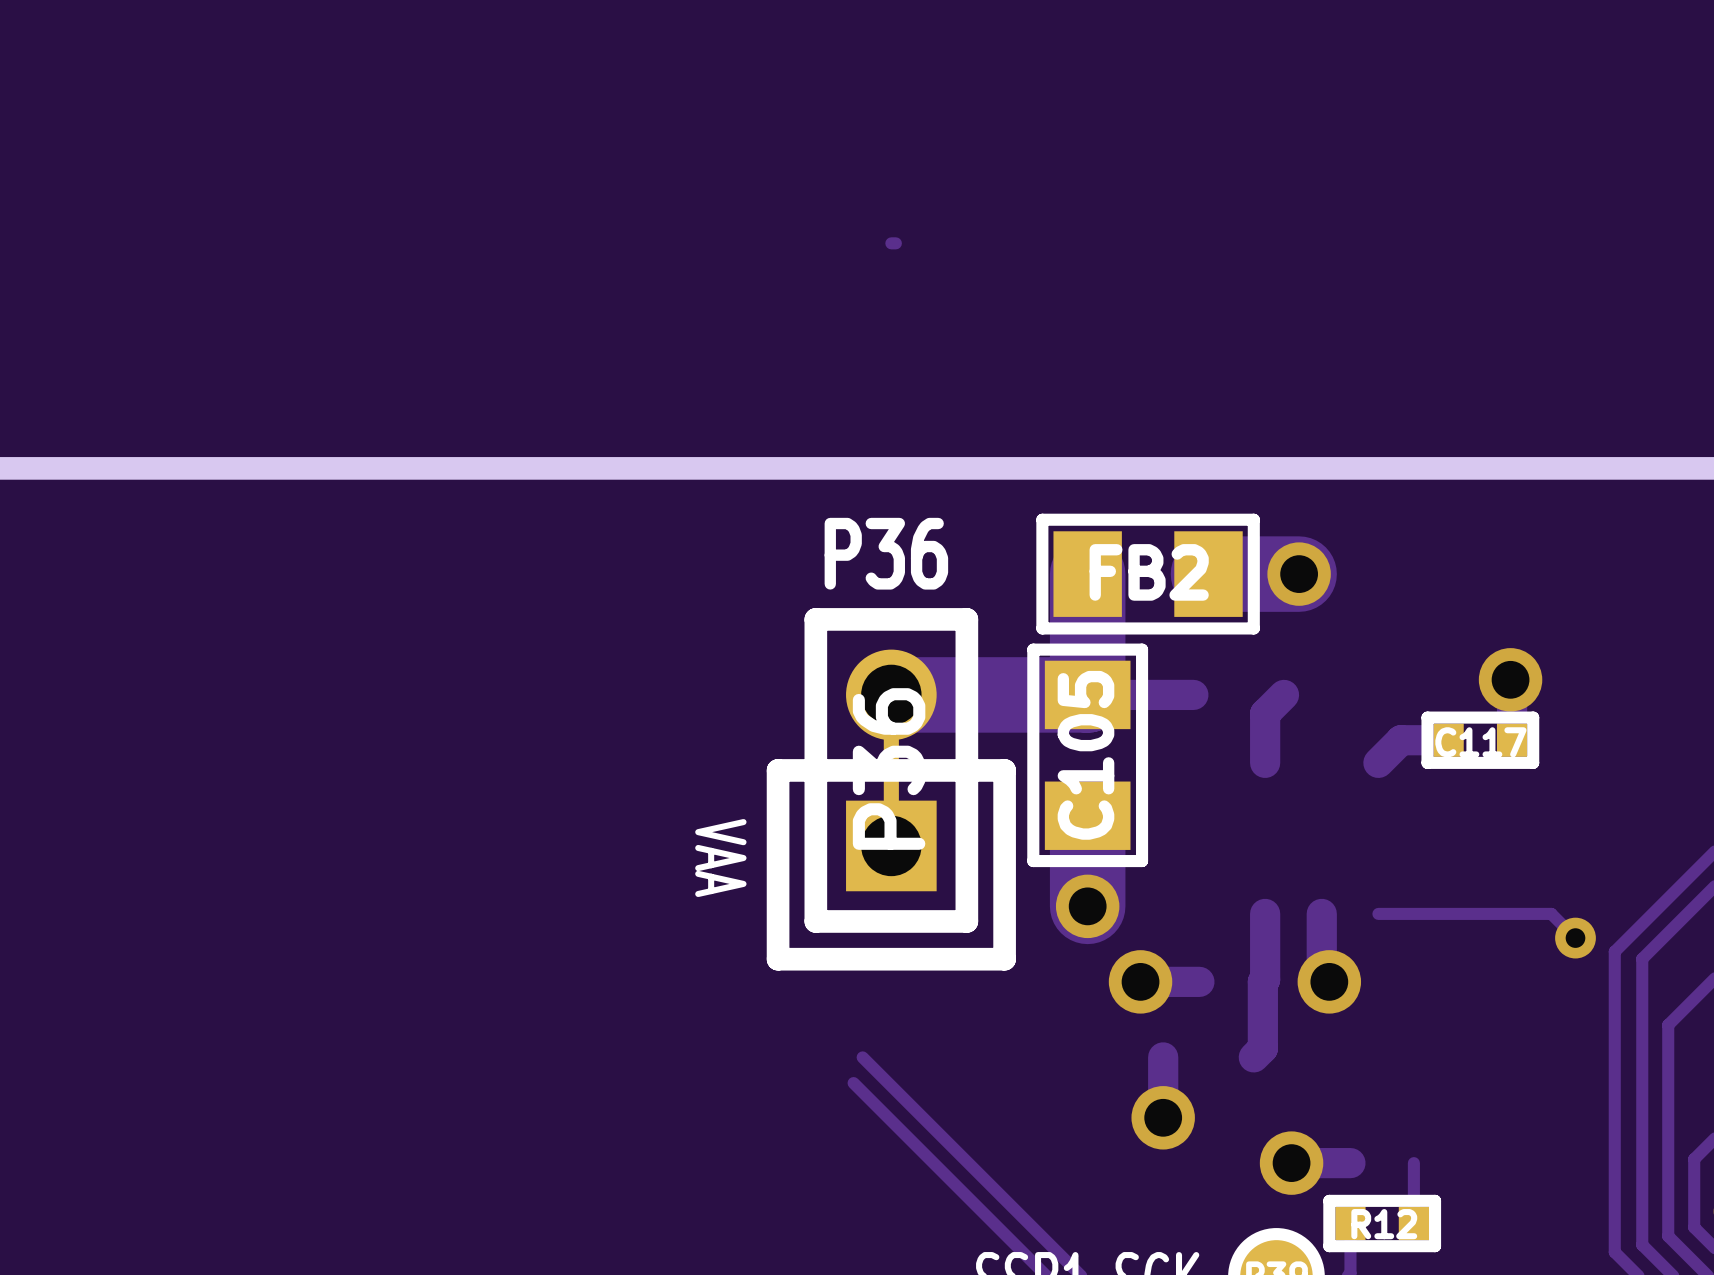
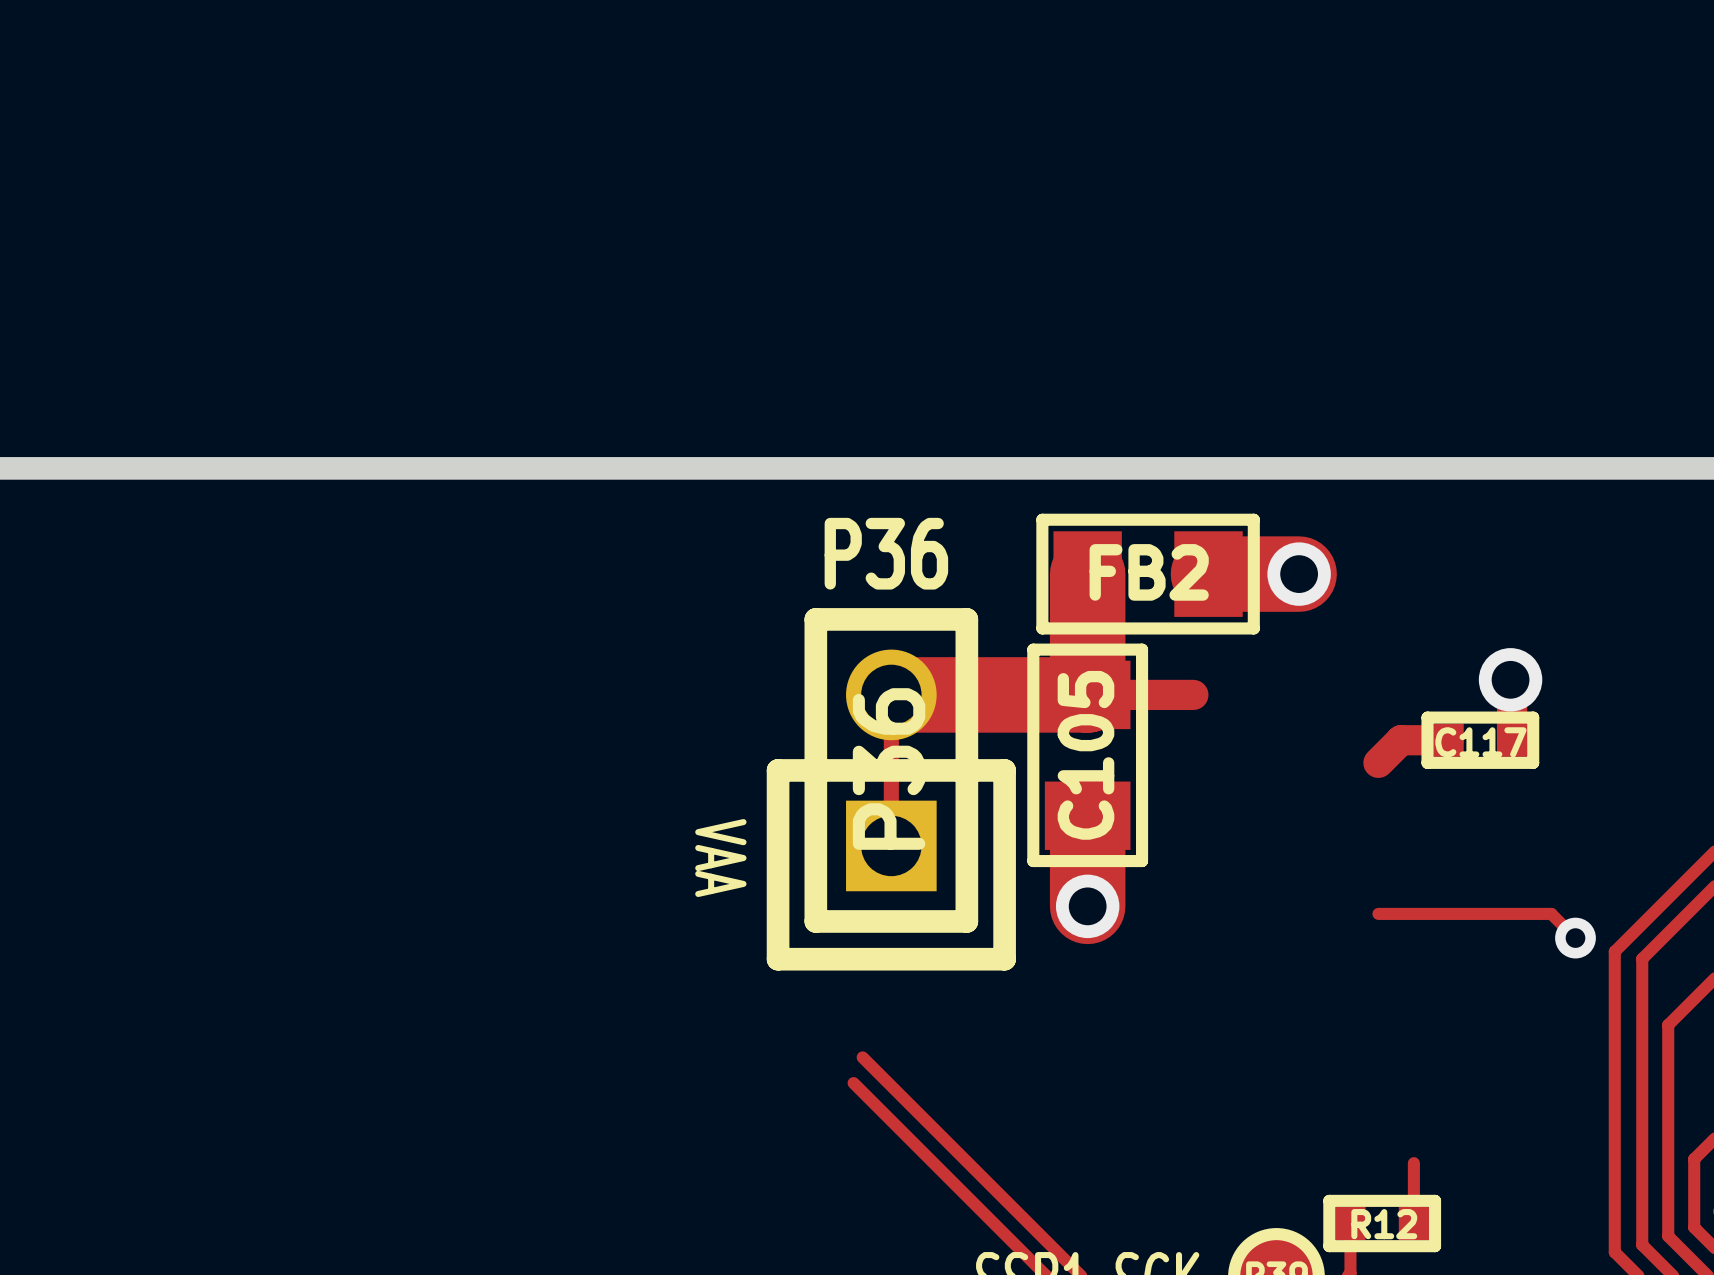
track: (891, 243) (895, 243) -> none
track: (1284, 694) (1265, 713) (1265, 762) -> none
track: (1265, 913) (1262, 1048) (1253, 1057) -> none
track: (1321, 913) (1321, 974) (1329, 981) -> none
track: (1140, 981) (1199, 981) -> none
via: (1140, 981) -> none
via: (1329, 981) -> none
track: (1163, 1057) (1163, 1117) -> none
via: (1163, 1117) -> none
track: (1291, 1163) (1350, 1163) -> none
via: (1291, 1163) -> none

